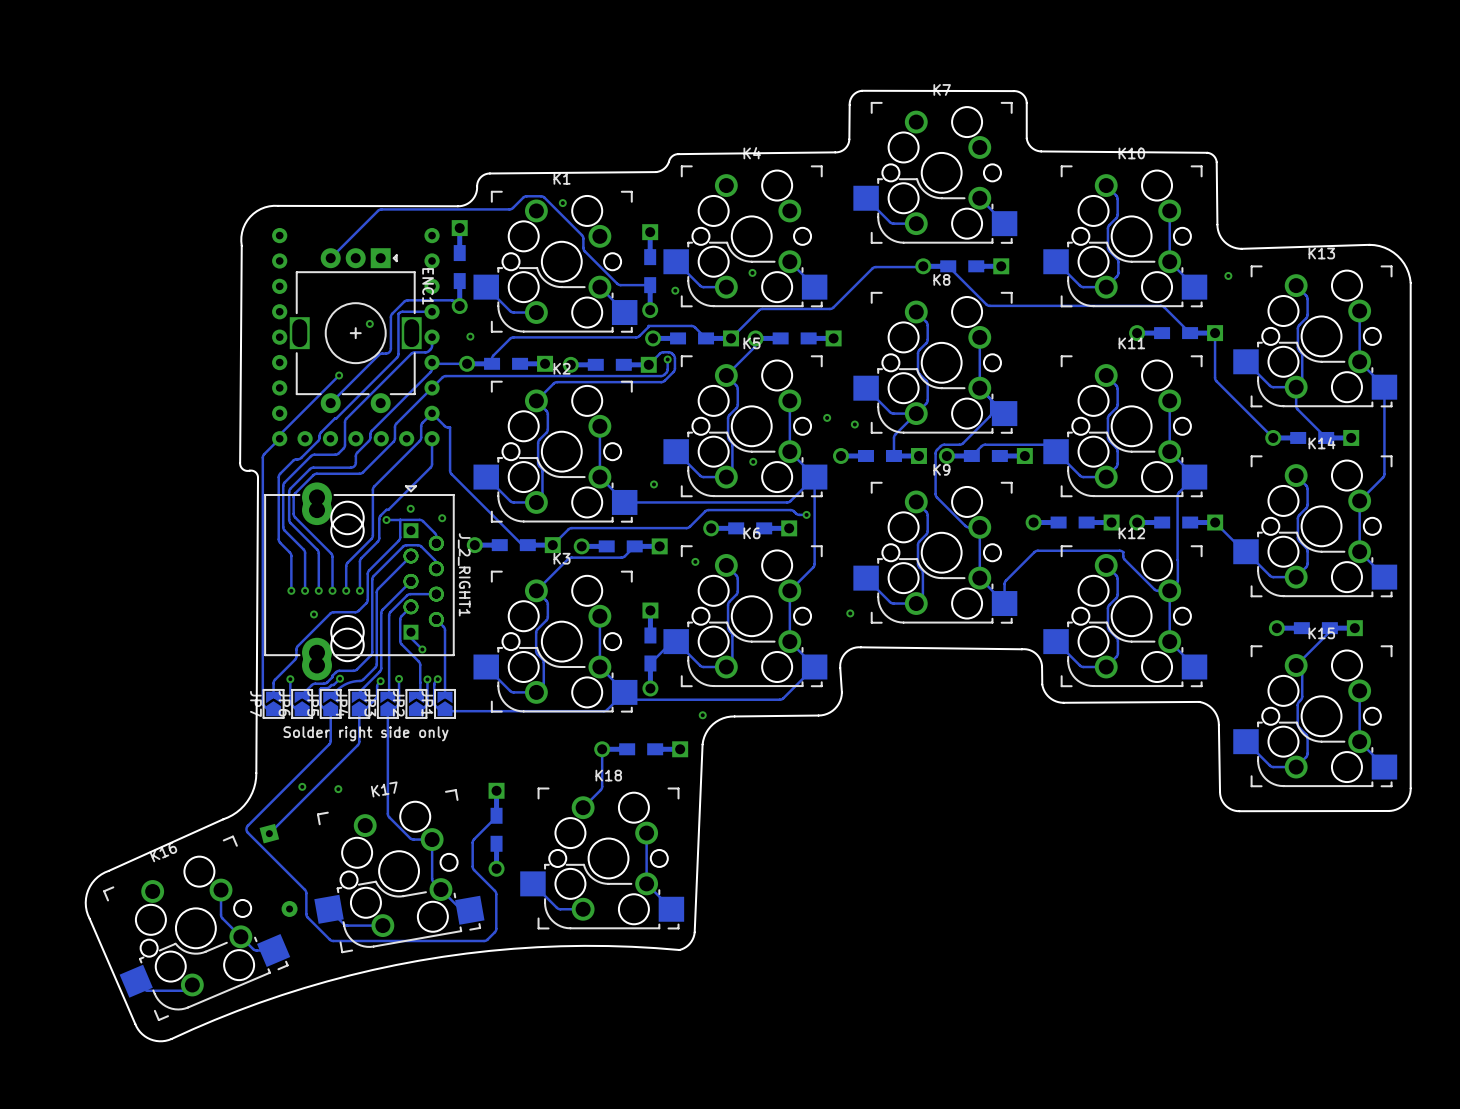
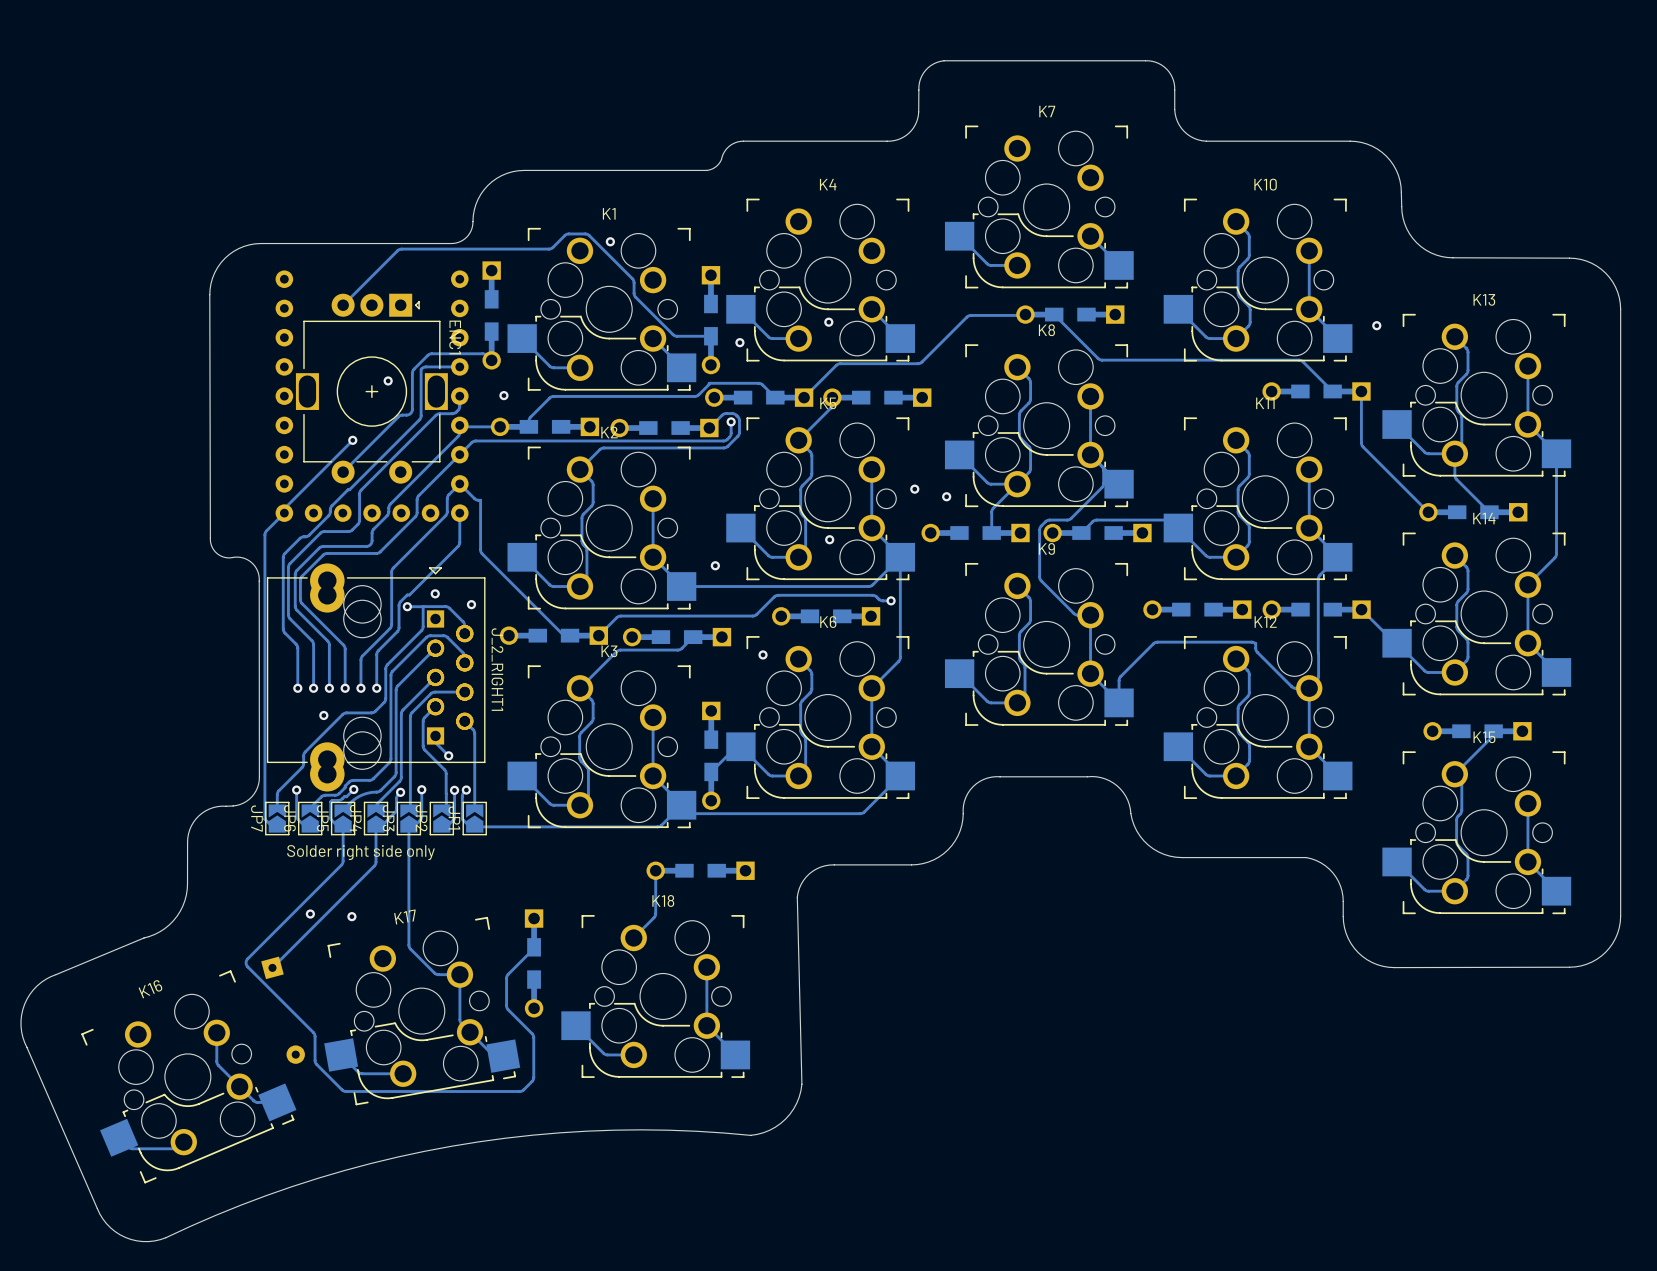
board edge: (861, 90) (1017, 91) (1023, 95) (1026, 101) (1027, 140) (1031, 147) (1037, 150) (1207, 152) (1212, 155) (1216, 162) (1218, 230) (1222, 239) (1231, 246) (1241, 248) (1374, 245) (1389, 249) (1401, 259) (1408, 272) (1410, 282) (1410, 788) (1406, 802) (1398, 808) (1388, 810) (1235, 810) (1225, 805) (1220, 796) (1218, 722) (1213, 709) (1204, 703) (1058, 702) (1049, 697) (1043, 689) (1039, 658) (1033, 652) (1026, 649) (856, 647) (847, 651) (841, 658) (841, 698) (837, 706) (830, 712) (818, 715) (726, 717) (716, 721) (705, 733) (702, 744) (694, 932) (691, 941) (684, 948) (679, 950) (608, 946) (537, 947) (490, 950) (419, 960) (349, 975) (281, 995) (236, 1011) (168, 1040) (156, 1040) (144, 1036) (136, 1026) (87, 915) (85, 902) (88, 890) (94, 879) (105, 872) (236, 812) (250, 797) (256, 778) (258, 477) (254, 471) (242, 469) (240, 463) (241, 236) (247, 220) (257, 211) (273, 205) (462, 205) (473, 198) (479, 179) (488, 173) (656, 172) (664, 168) (671, 157) (677, 154) (838, 152) (845, 148) (848, 142) (850, 99) (854, 94) (861, 90) -> (232, 557) (223, 556) (216, 553) (210, 540) (209, 294) (212, 277) (217, 267) (224, 258) (238, 248) (260, 243) (458, 242) (464, 238) (470, 231) (475, 204) (484, 189) (501, 175) (518, 170) (706, 170) (718, 164) (729, 146) (740, 141) (897, 139) (908, 133) (916, 121) (918, 86) (921, 76) (930, 65) (940, 61) (1155, 62) (1166, 68) (1172, 77) (1174, 86) (1176, 117) (1184, 131) (1194, 138) (1206, 141) (1350, 141) (1367, 144) (1382, 152) (1393, 165) (1400, 180) (1404, 223) (1412, 238) (1425, 249) (1447, 257) (1580, 259) (1601, 269) (1615, 287) (1620, 309) (1619, 927) (1612, 943) (1605, 952) (1591, 962) (1575, 966) (1383, 966) (1367, 959) (1351, 943) (1344, 927) (1340, 886) (1329, 868) (1316, 860) (1306, 857) (1169, 856) (1153, 848) (1140, 836) (1134, 825) (1125, 796) (1120, 788) (1109, 780) (1091, 776) (991, 777) (976, 783) (967, 793) (964, 801) (961, 825) (957, 835) (951, 845) (938, 857) (917, 864) (825, 865) (812, 871) (803, 880) (797, 897) (801, 1084) (796, 1103) (789, 1114) (780, 1123) (769, 1130) (750, 1135) (668, 1130) (586, 1131) (505, 1138) (451, 1146) (371, 1163) (292, 1186) (241, 1205) (160, 1239) (148, 1241) (131, 1239) (110, 1227) (99, 1213) (24, 1042) (21, 1026) (21, 1015) (29, 994) (46, 979) (154, 934) (169, 924) (180, 911) (186, 894) (187, 837) (193, 822) (209, 808) (243, 803) (256, 790) (259, 777) (259, 576) (256, 568) (249, 561) (242, 557) (232, 557)
via: (850, 613) -> none
via: (702, 715) -> none

